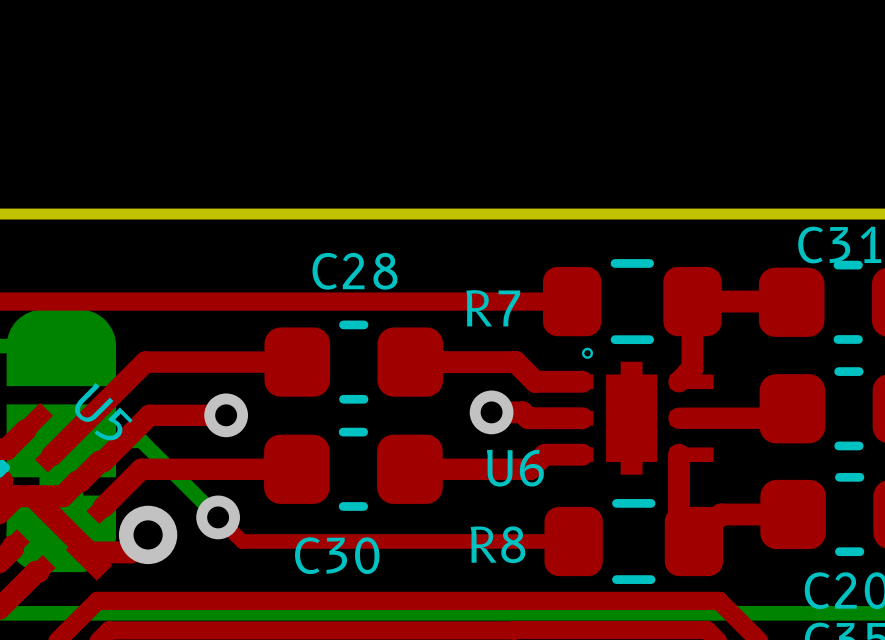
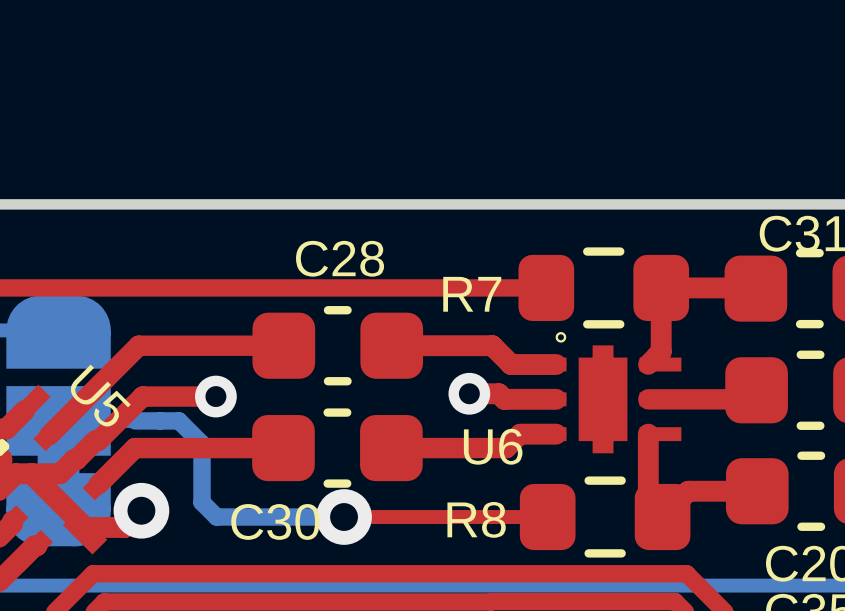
bottom track: (141, 440) (218, 517) -> (135, 420) (179, 420) (201, 443) (201, 502) (216, 517) (344, 517)
top track: (218, 517) (242, 541) (360, 541) -> none
via: (218, 517) -> none
via: none -> (344, 517)
C30 name position: C30 (337, 555) -> C30 (275, 521)

